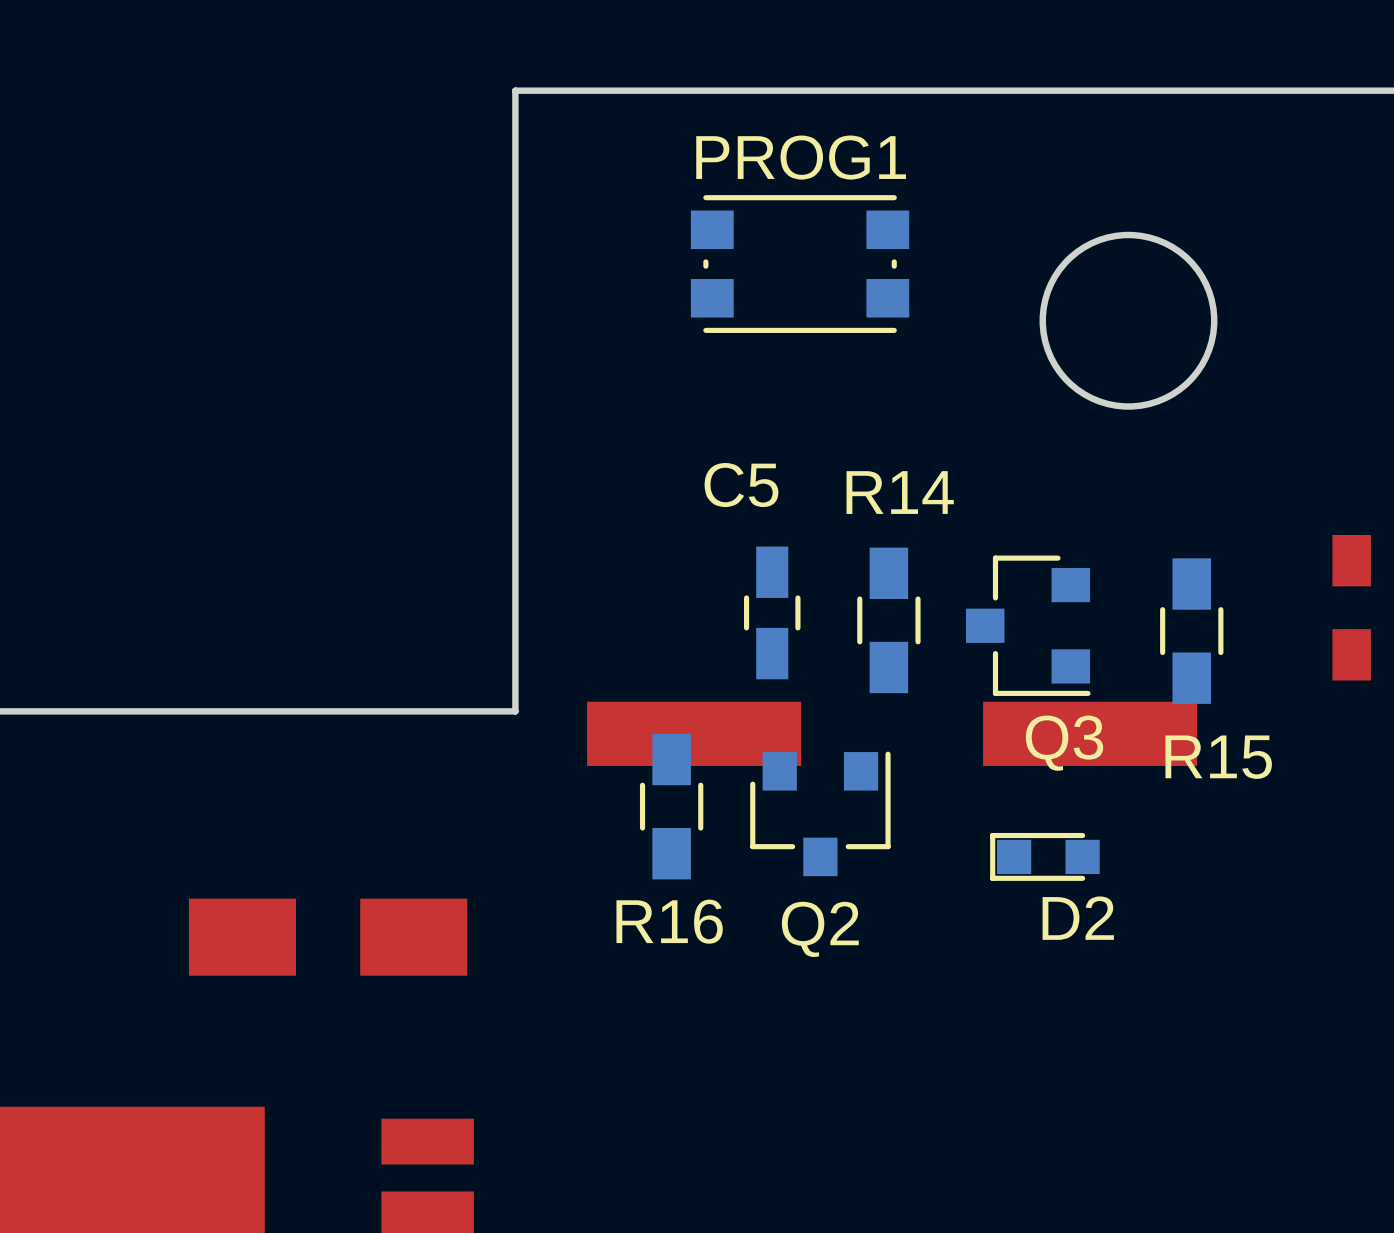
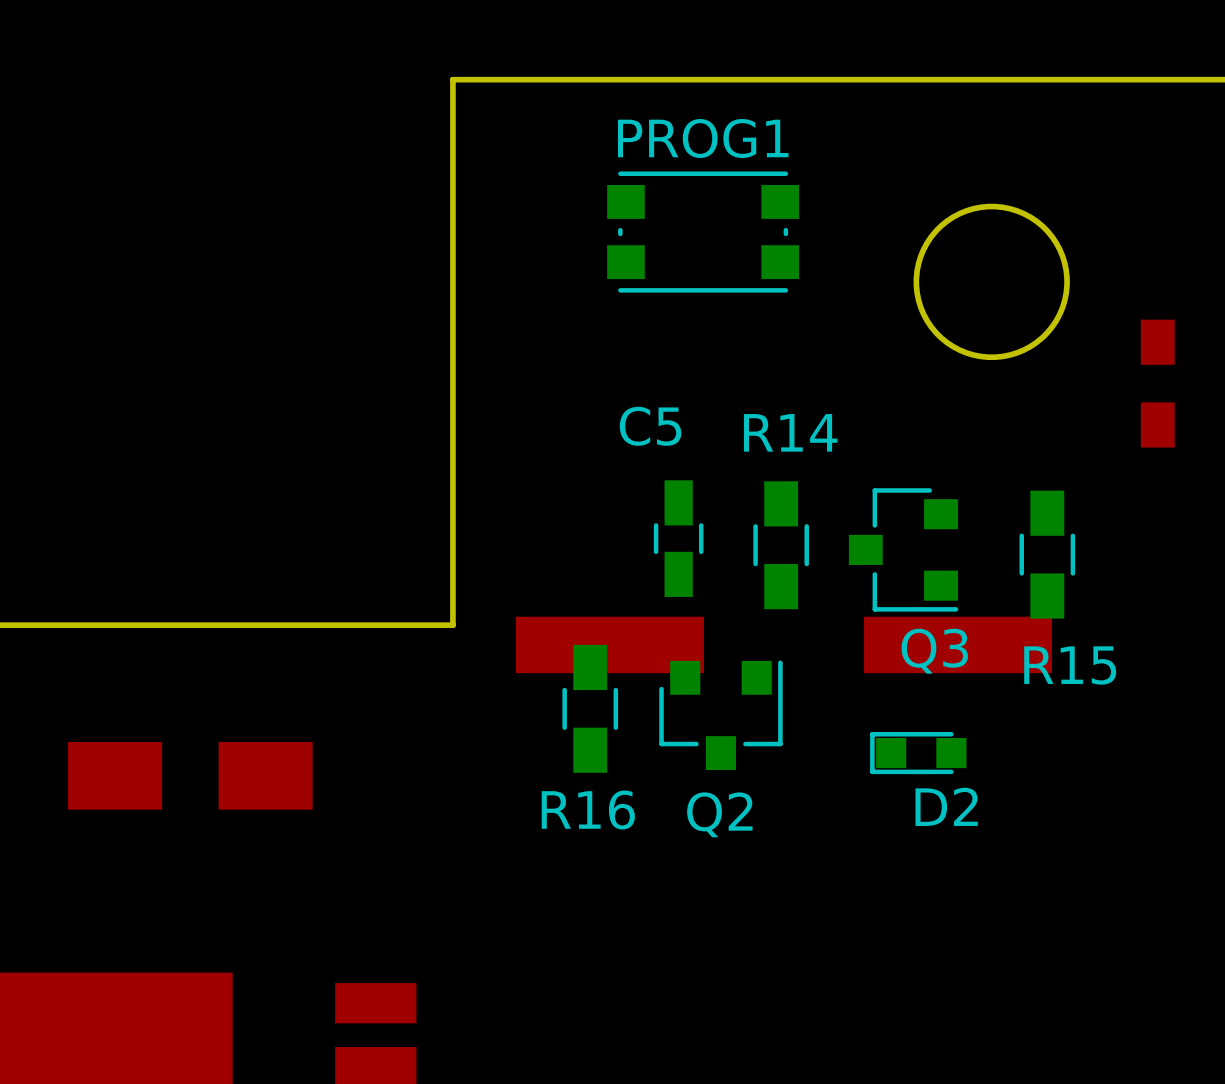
part position: (1351, 607) -> (1157, 383)
part position: (328, 937) -> (190, 775)

